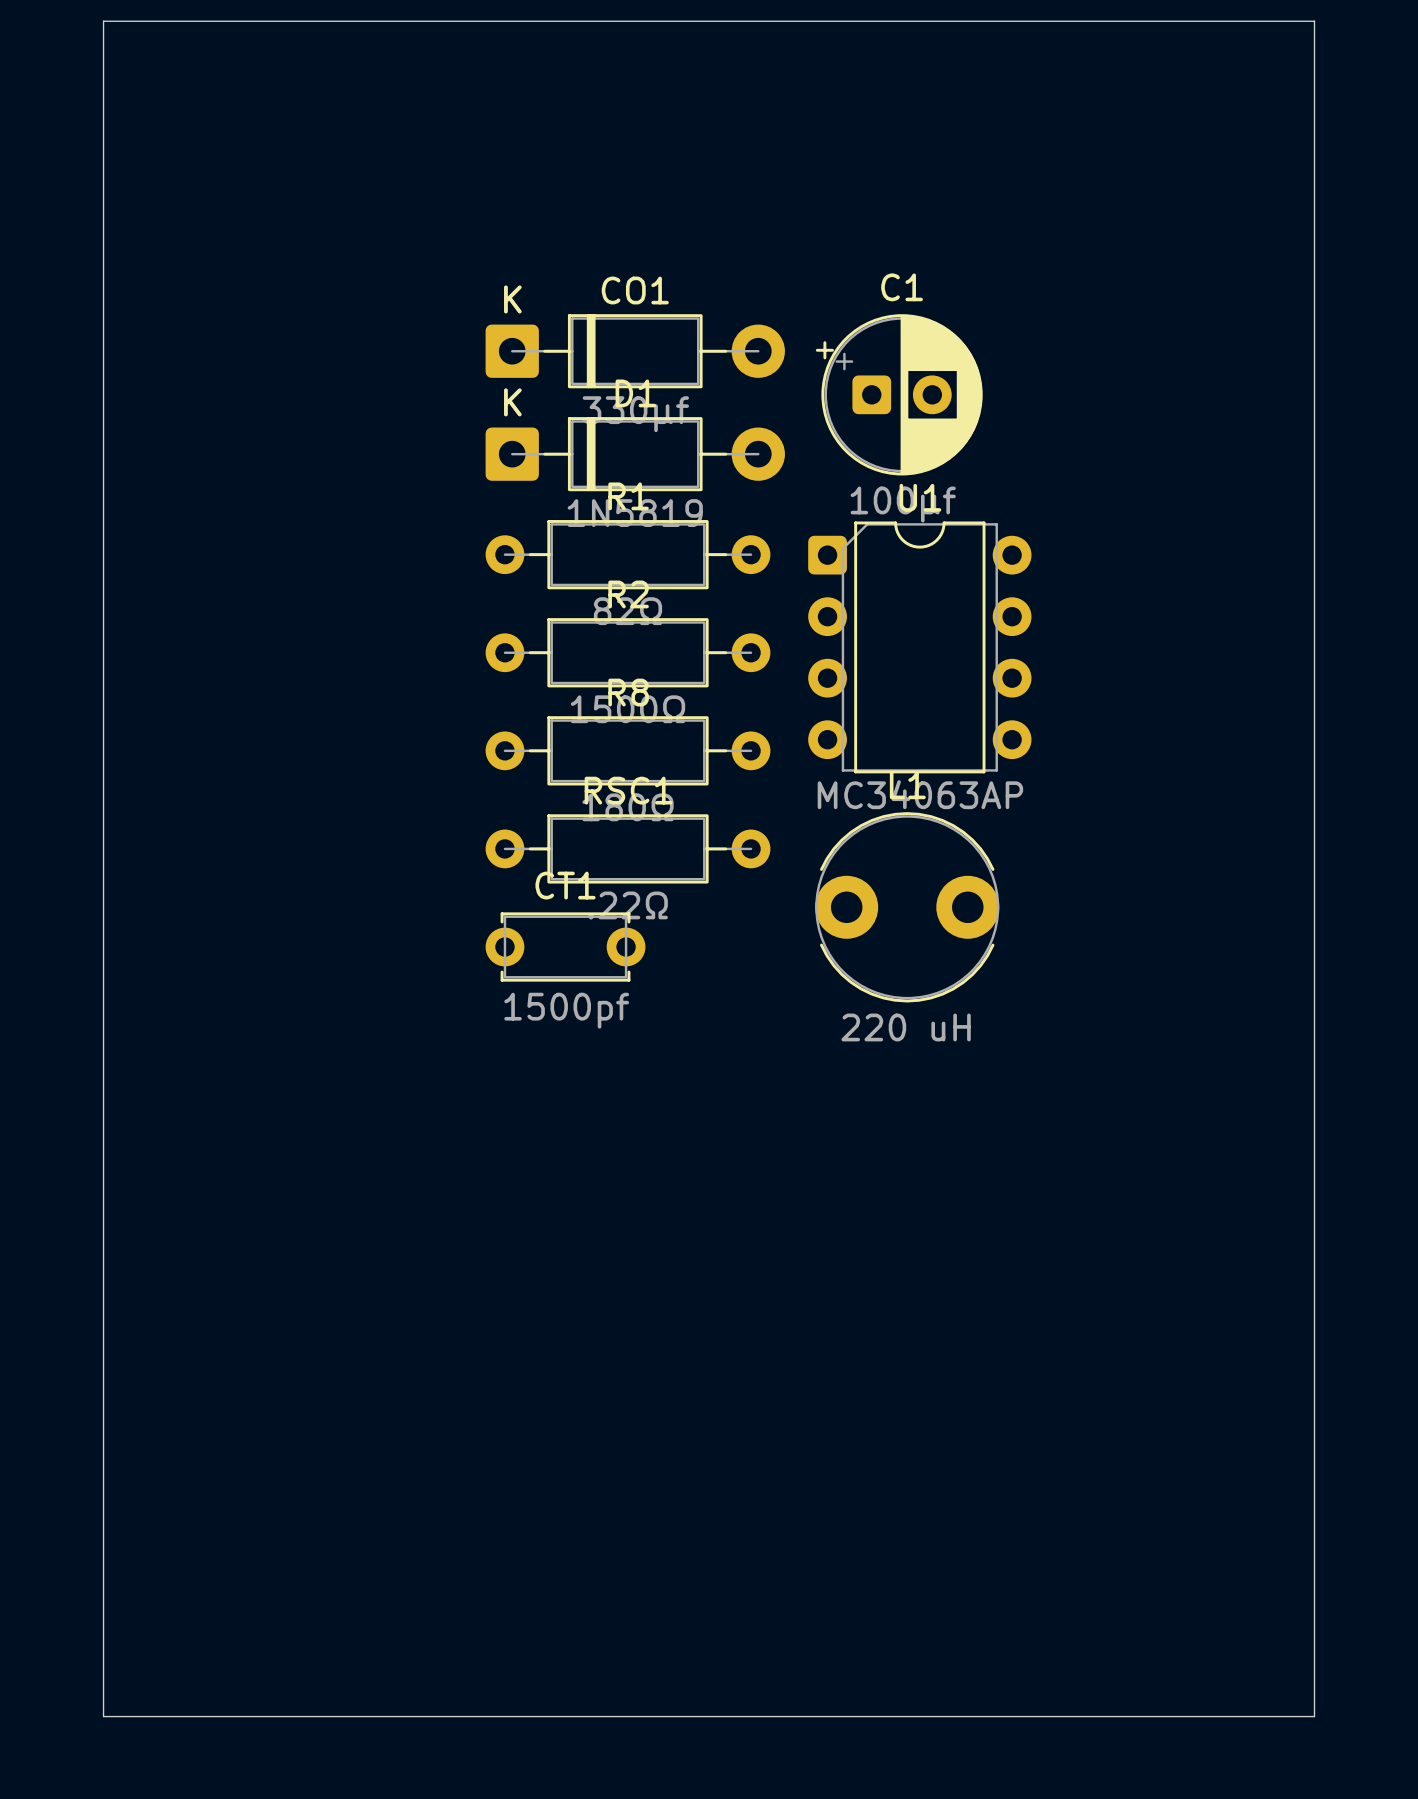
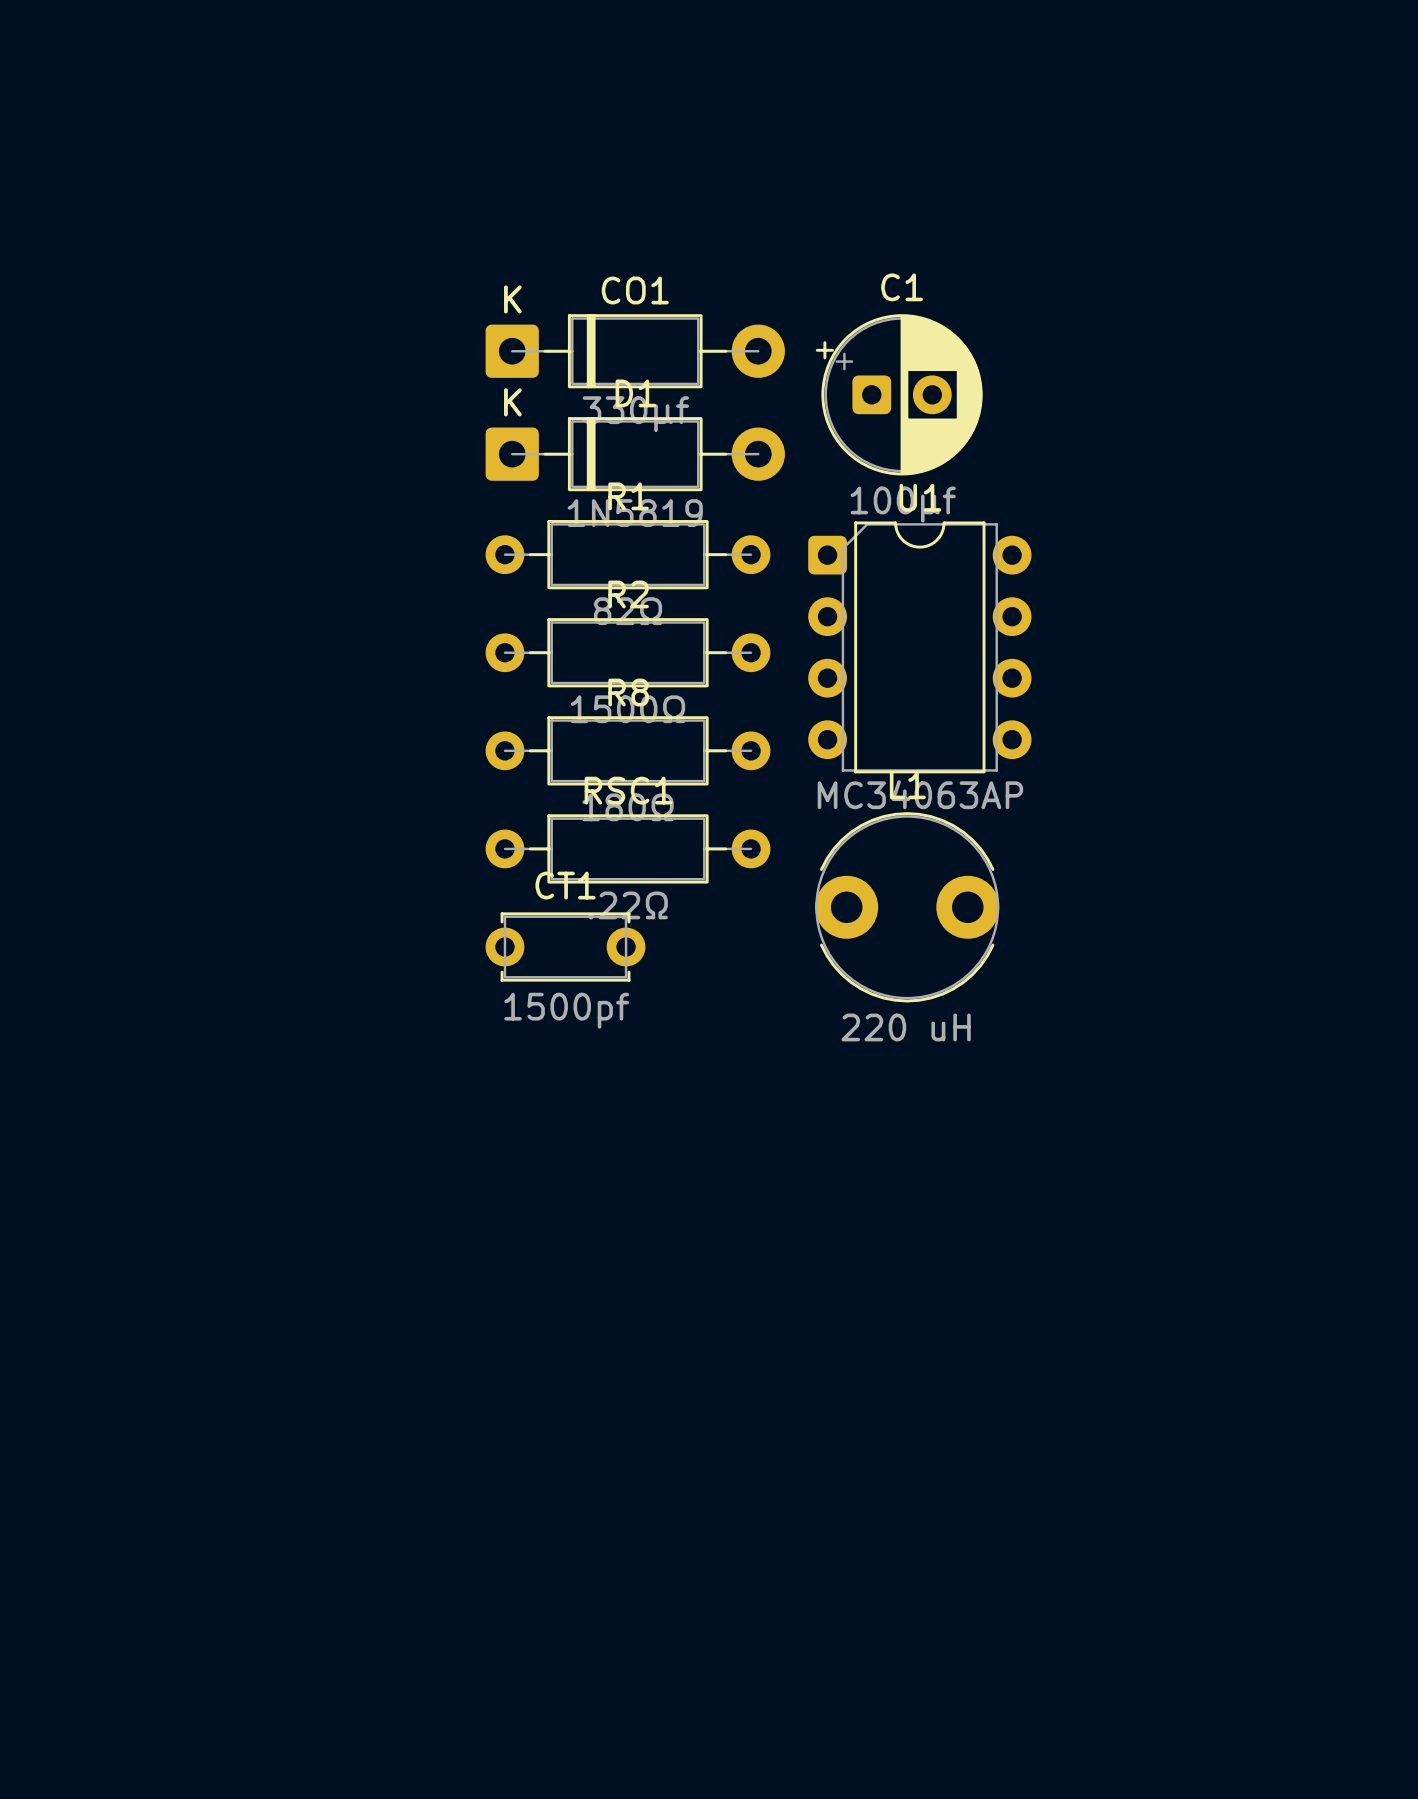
board edge: (103, 21) (1314, 21) (1314, 1716) (103, 1716) (103, 21) -> none

